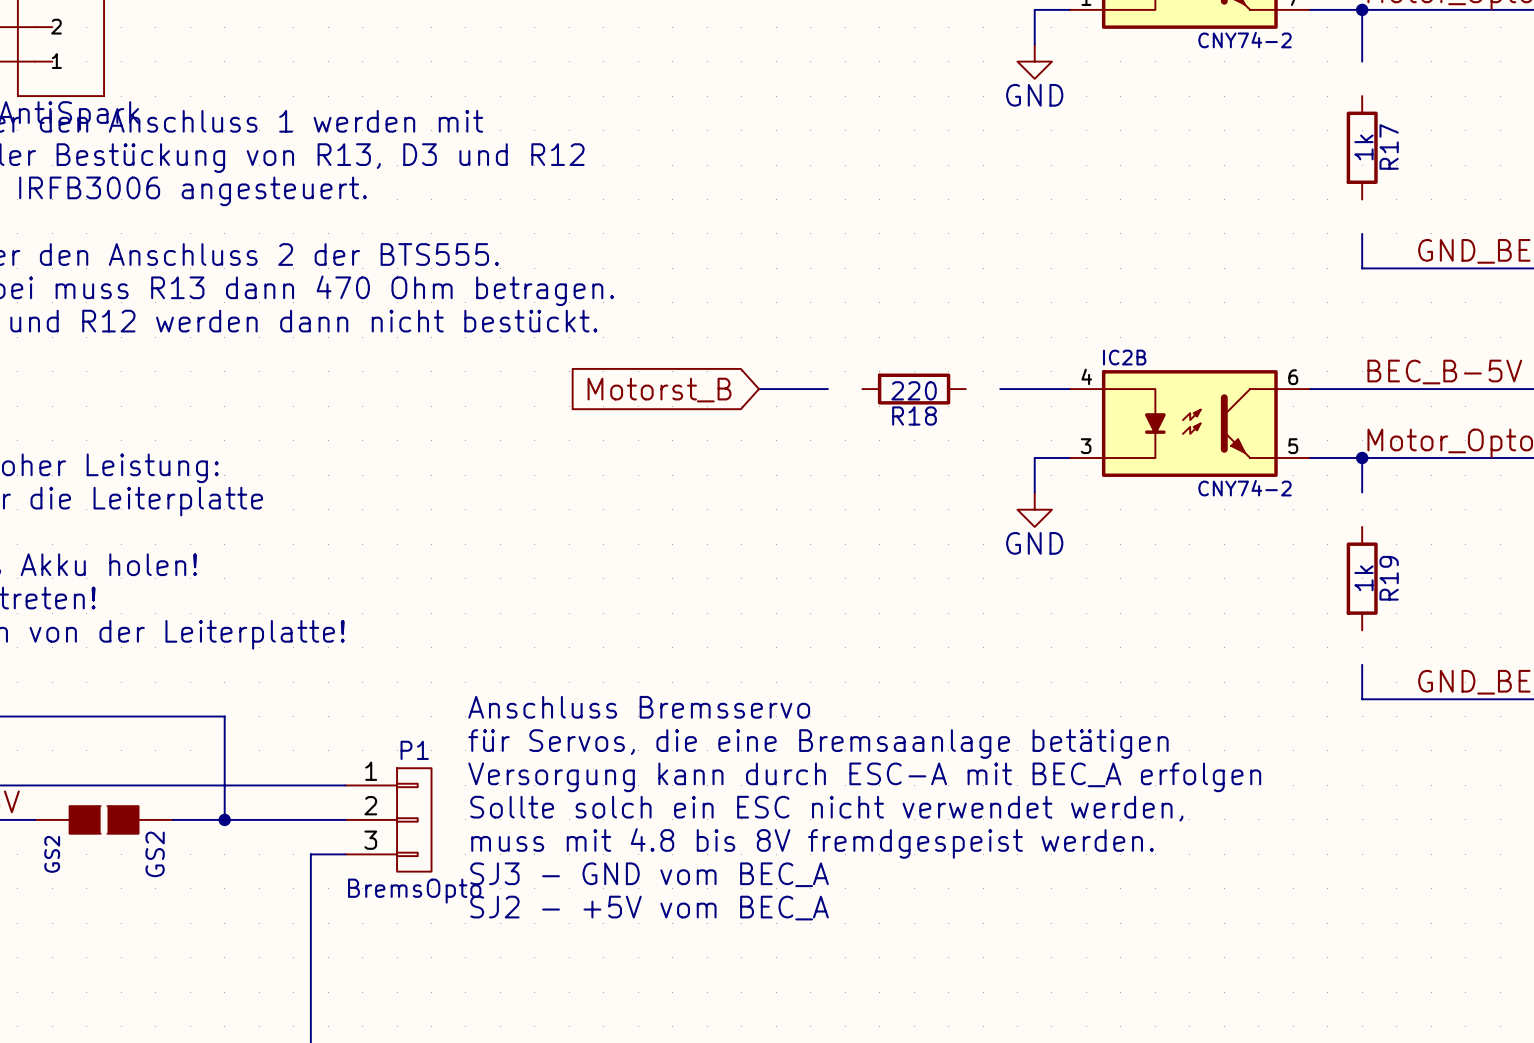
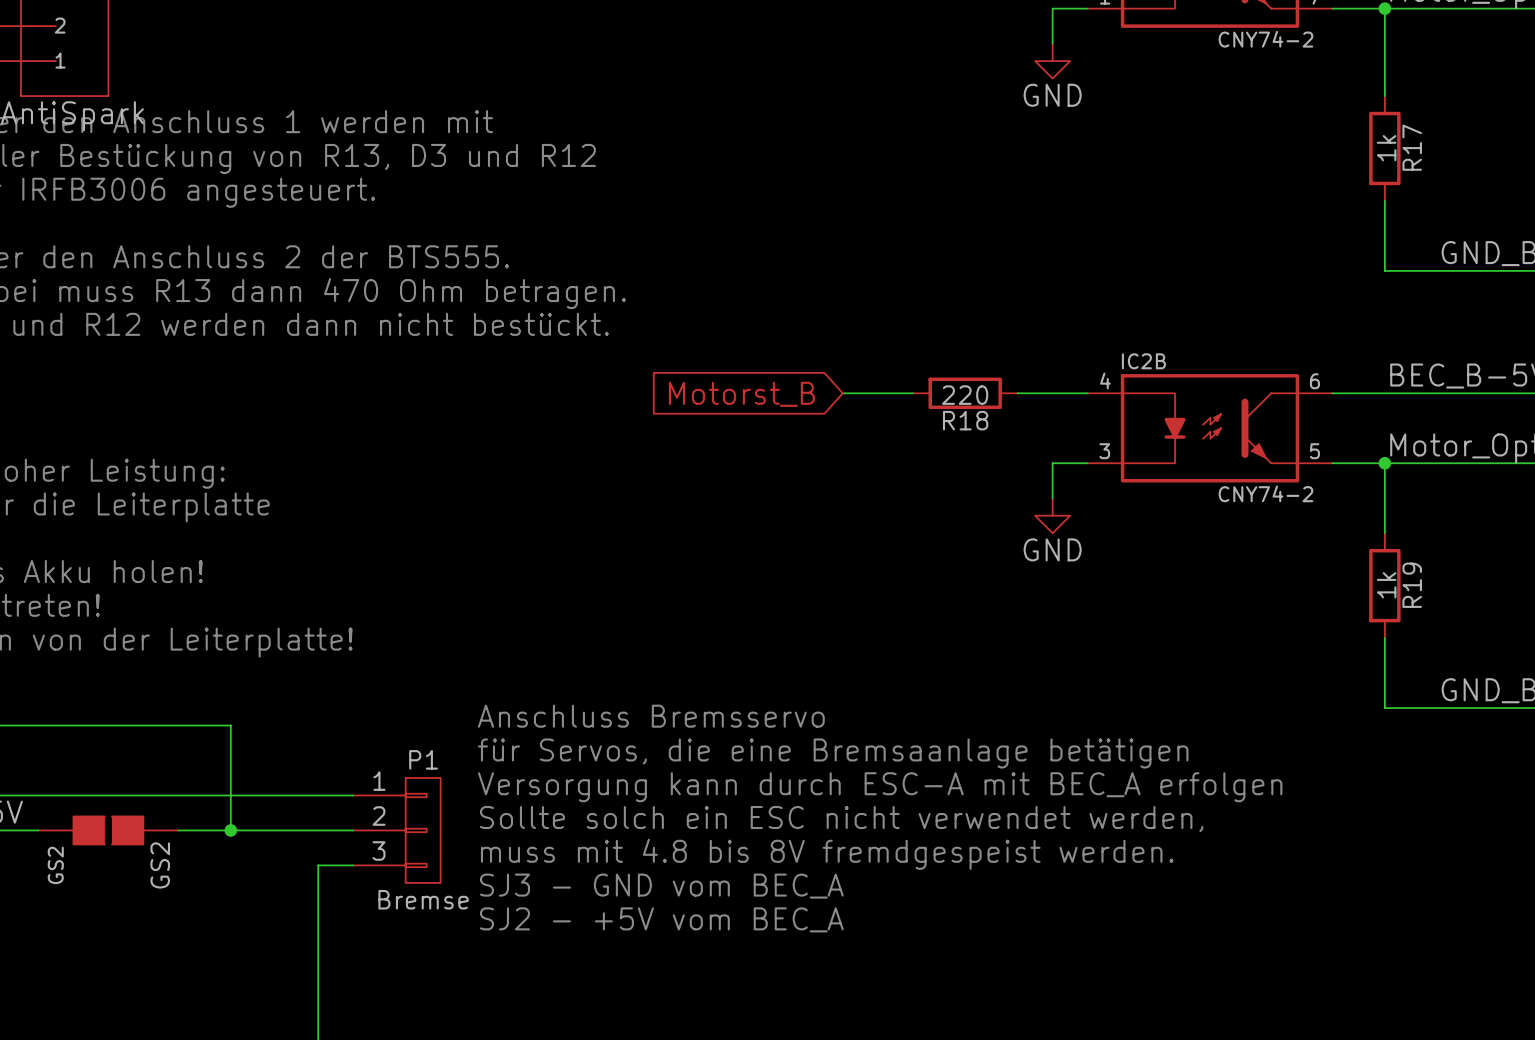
wire: none -> (1384, 61) (1384, 96)
wire: none -> (1384, 200) (1384, 235)
wire: (758, 389) (827, 389) -> (912, 393) (842, 393)
R18 position: (914, 389) -> (965, 393)
global label position: Motorst_B (659, 390) -> Motorst_B (741, 394)
wire: none -> (1384, 498) (1384, 533)
wire: none -> (1384, 638) (1384, 673)
P1 value: BremsOpto (414, 891) -> Bremse (423, 899)

